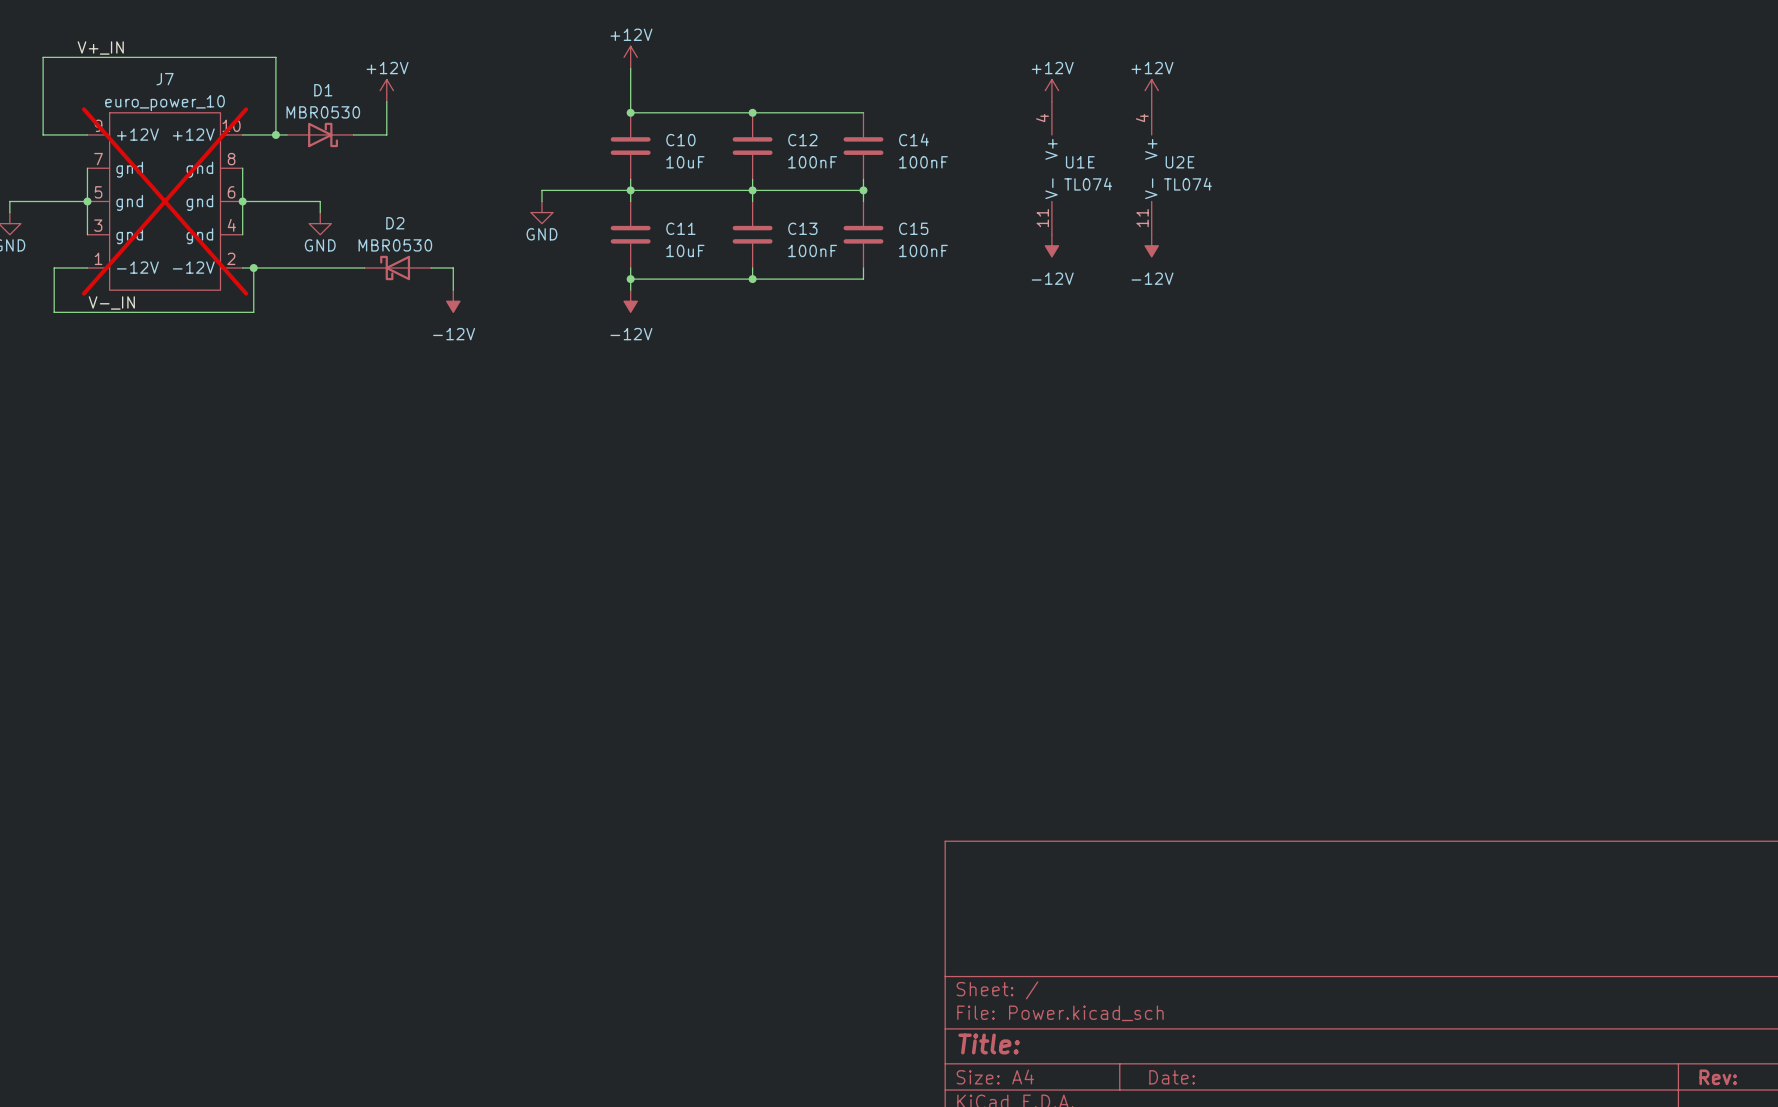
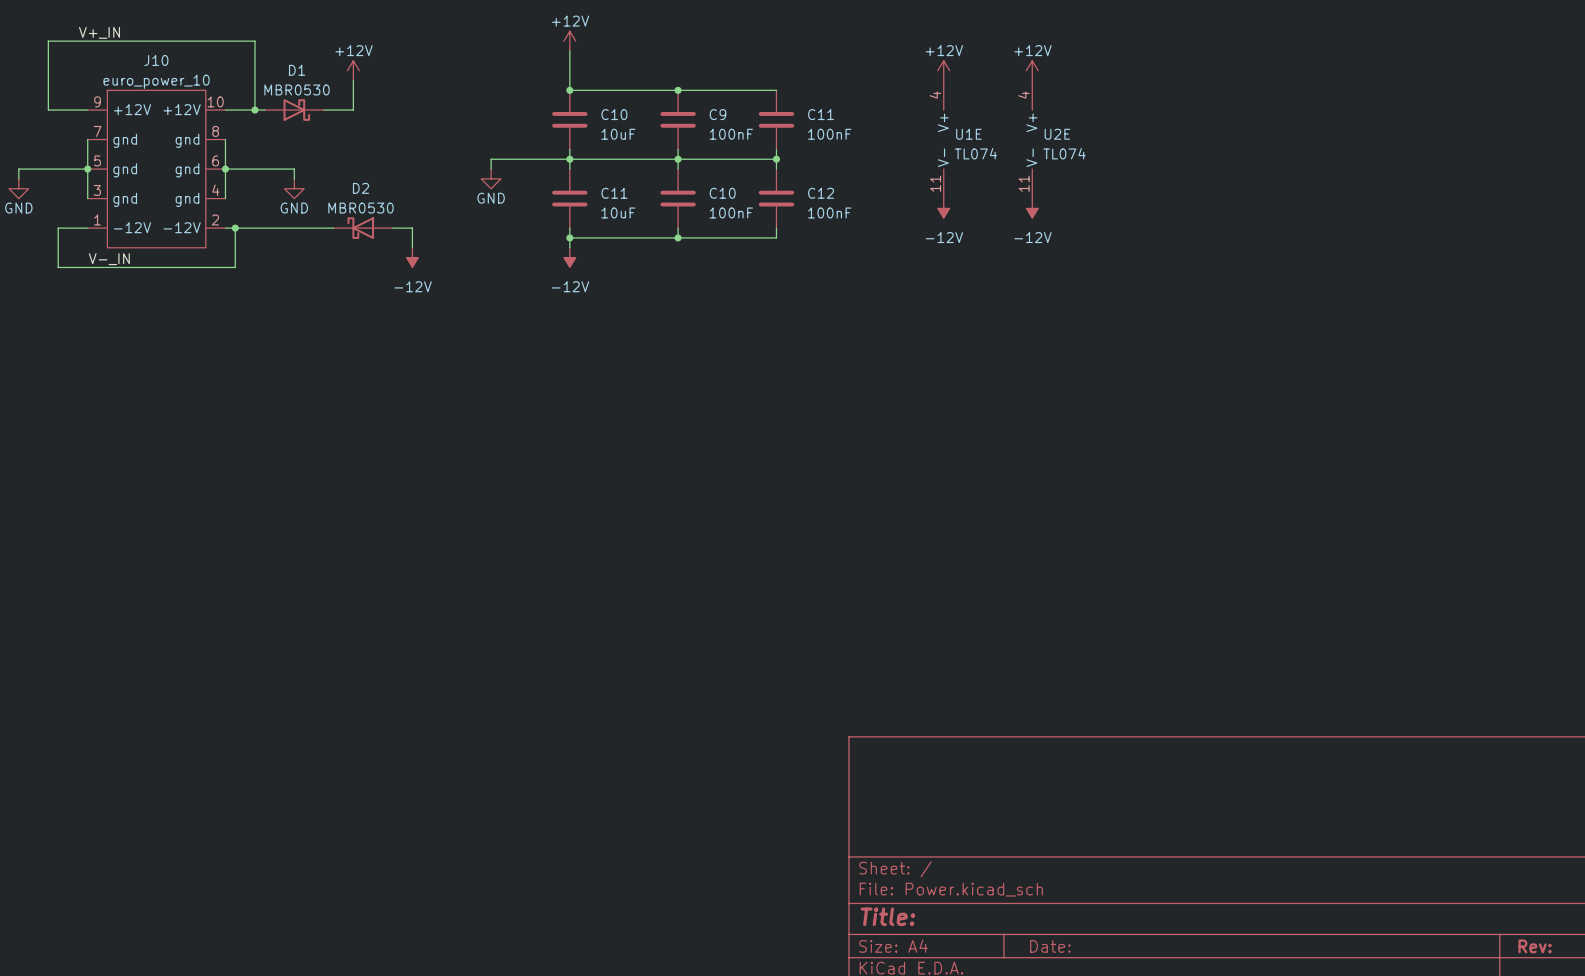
J7 name: J7 (165, 79) -> J10 (156, 60)
C14 name: C14 (913, 139) -> C11 (821, 114)
C12 name: C12 (802, 140) -> C9 (717, 114)
J7 do-not-place cross: (165, 201) -> none
C13 name: C13 (802, 228) -> C10 (722, 193)
C15 name: C15 (913, 228) -> C12 (821, 193)

